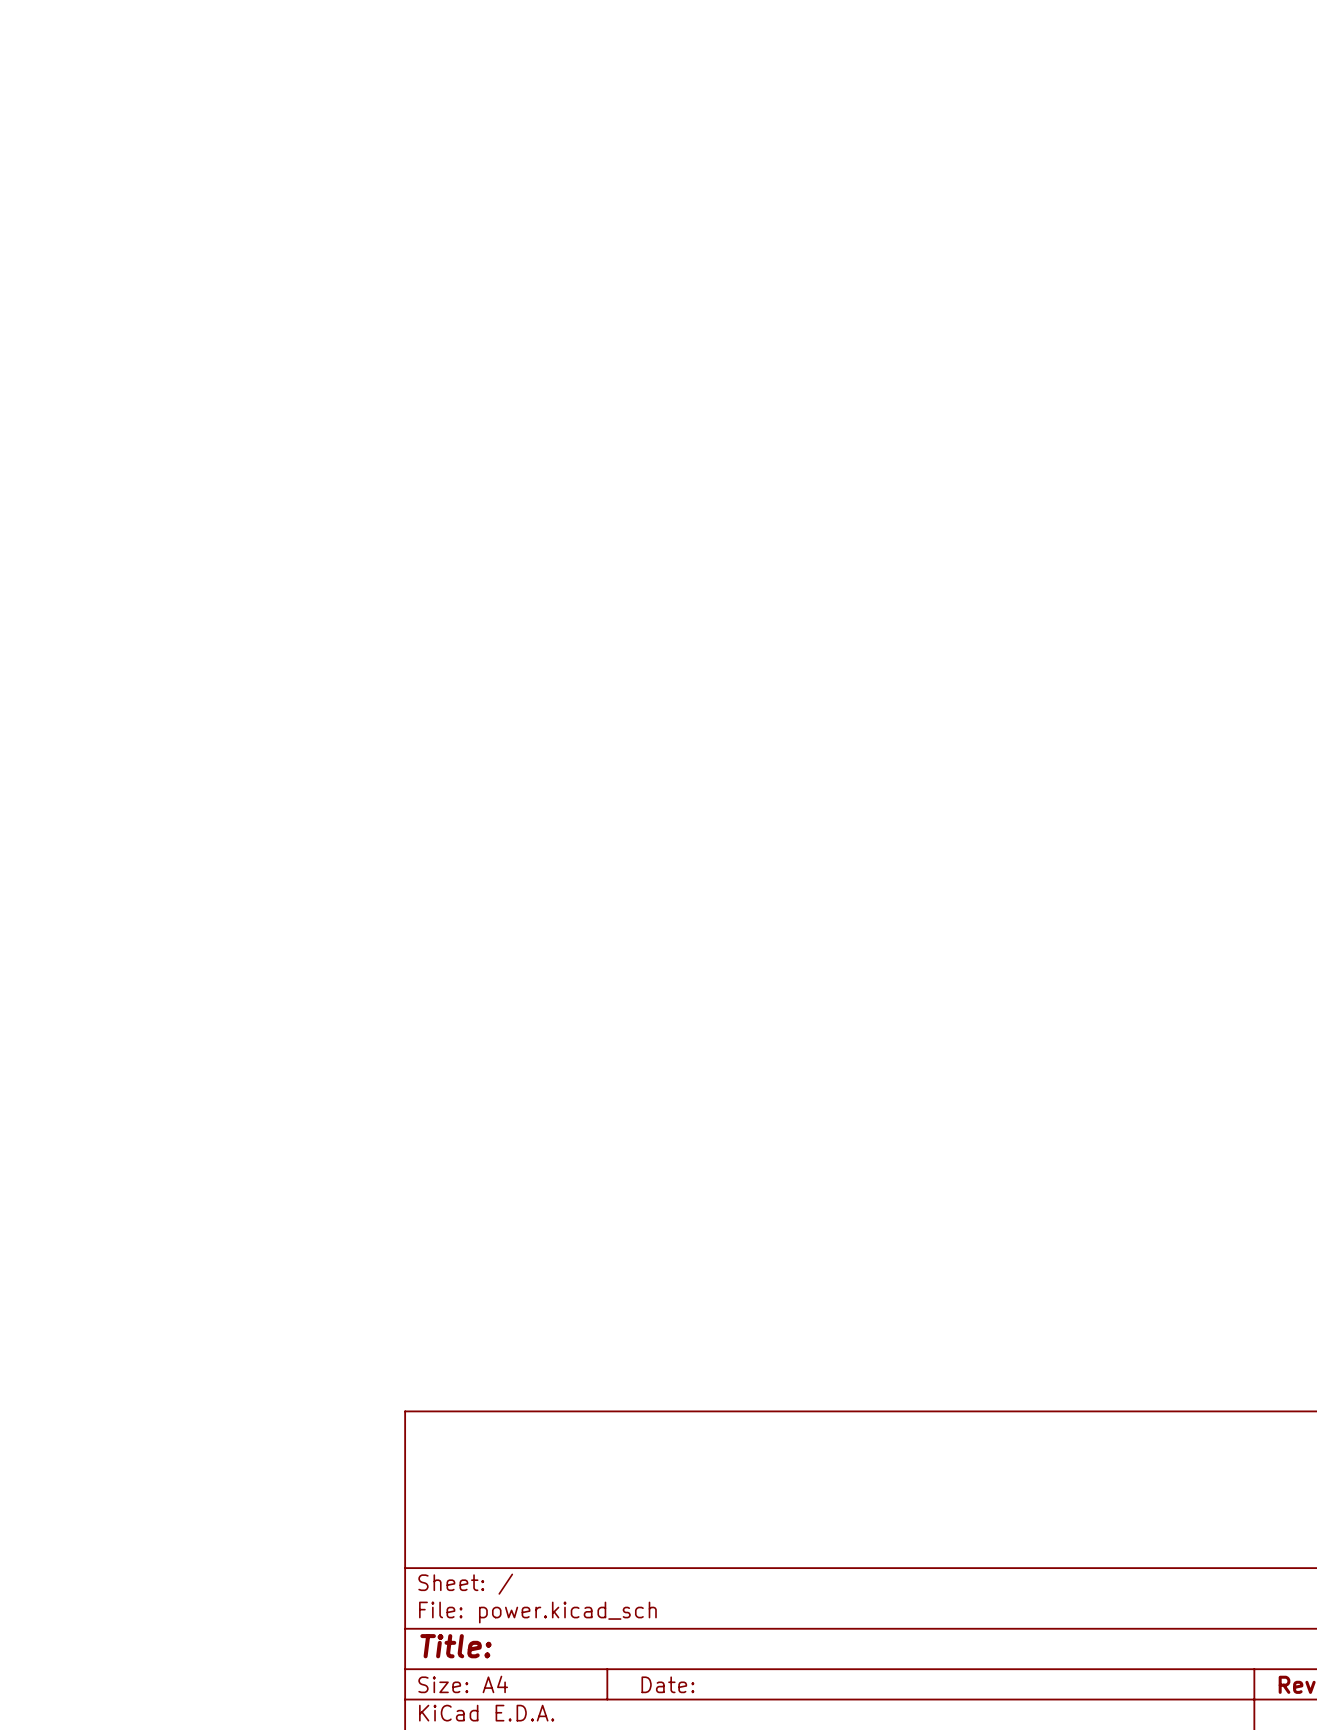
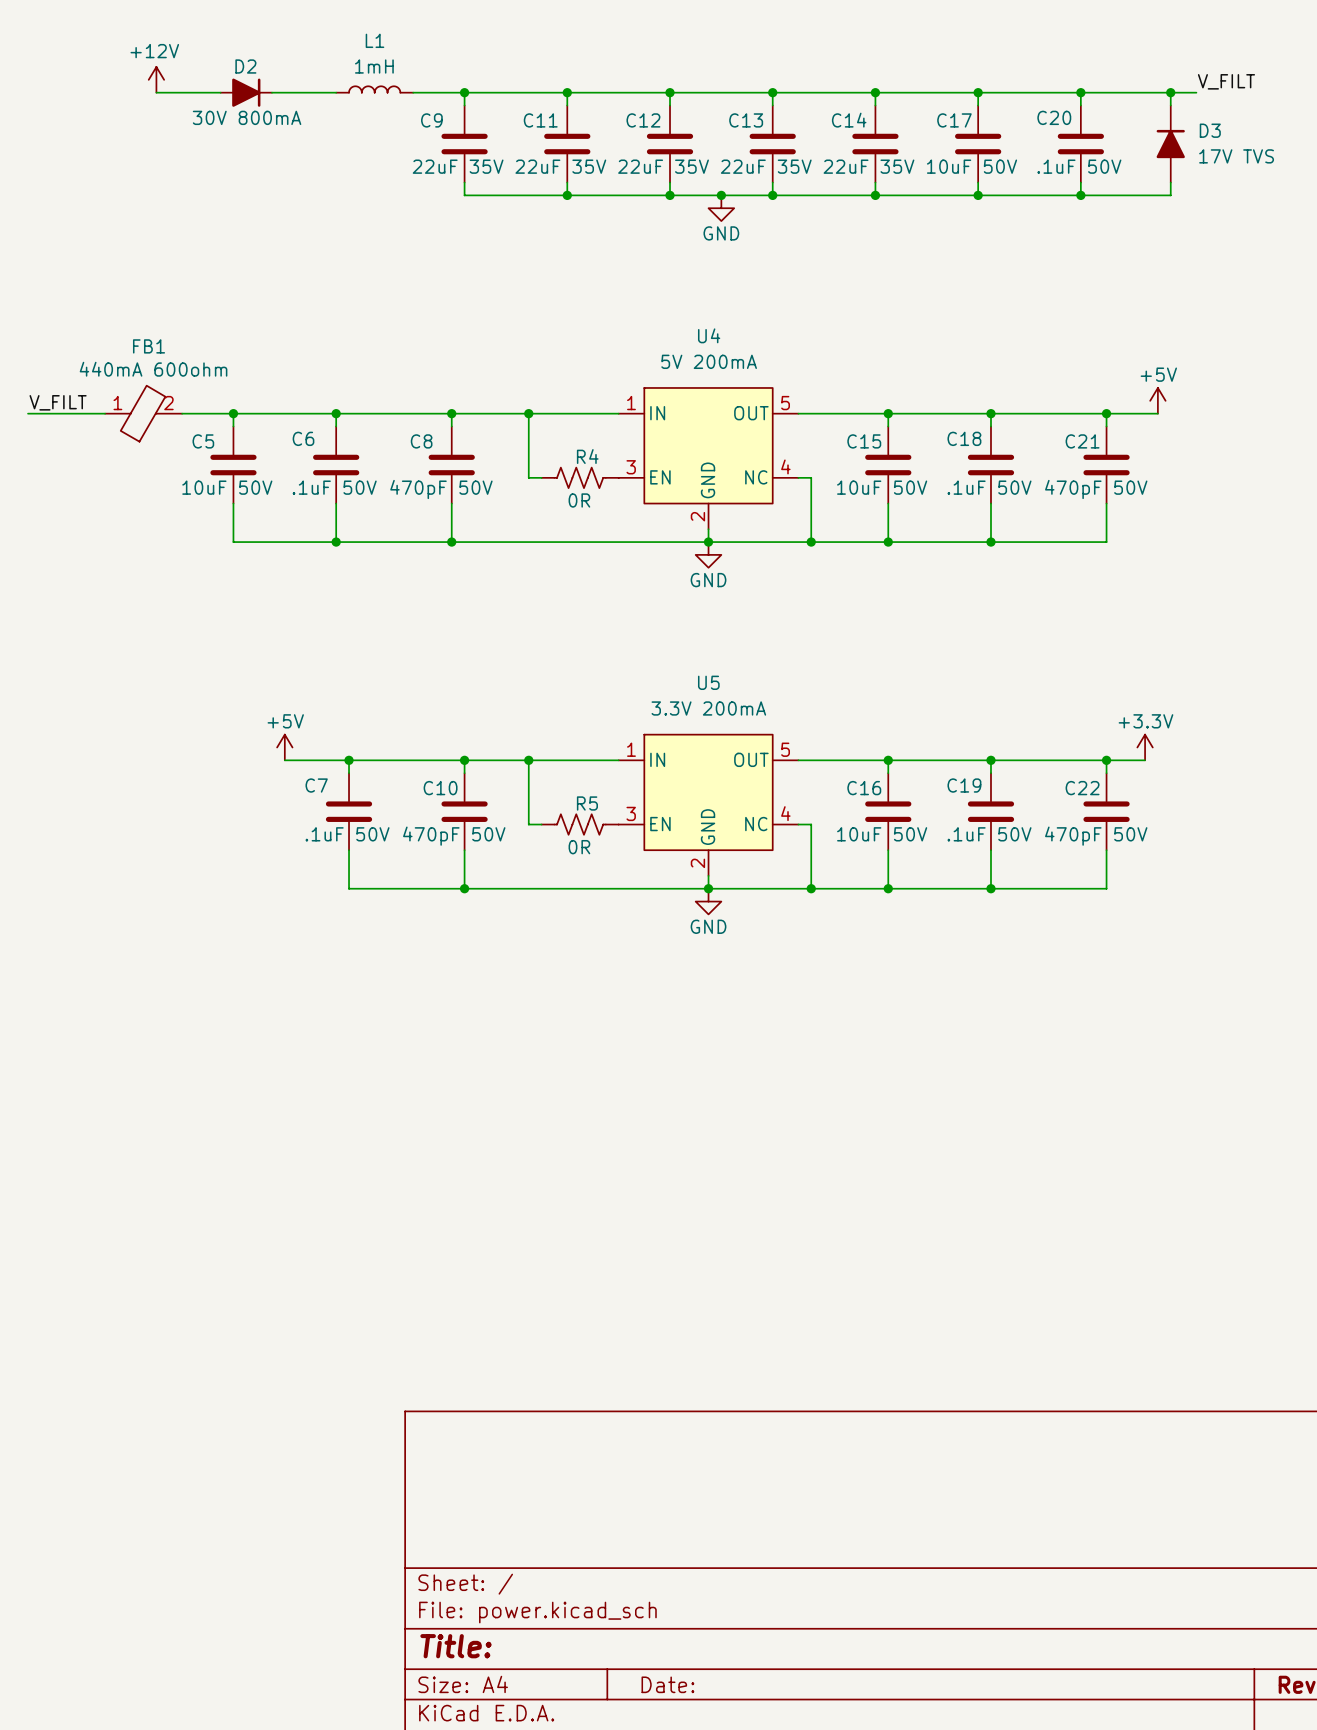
power symbol: none -> +12V (156, 79)
label: none -> V_FILT (1226, 81)
L1: none -> 1mH (374, 89)
wire: none -> (156, 92) (220, 92)
D2: none -> 30V 800mA (246, 92)
wire: none -> (271, 92) (336, 92)
wire: none -> (413, 92) (1196, 92)
wire: none -> (464, 92) (464, 105)
junction: none -> (464, 92)
wire: none -> (567, 92) (567, 105)
junction: none -> (567, 92)
wire: none -> (670, 92) (670, 105)
junction: none -> (670, 92)
wire: none -> (772, 92) (772, 105)
junction: none -> (772, 92)
wire: none -> (875, 92) (875, 105)
junction: none -> (875, 92)
wire: none -> (978, 92) (978, 105)
junction: none -> (978, 92)
wire: none -> (1080, 92) (1080, 105)
junction: none -> (1080, 92)
wire: none -> (1170, 92) (1170, 105)
junction: none -> (1170, 92)
C9: none -> 22uF 35V (464, 144)
C11: none -> 22uF 35V (567, 144)
C12: none -> 22uF 35V (670, 144)
C13: none -> 22uF 35V (772, 144)
C14: none -> 22uF 35V (875, 144)
C17: none -> 10uF 50V (978, 144)
C20: none -> .1uF 50V (1080, 144)
D3: none -> 17V TVS (1170, 144)
wire: none -> (464, 182) (464, 195) (1170, 195) (1170, 182)
wire: none -> (567, 182) (567, 195)
wire: none -> (670, 182) (670, 195)
wire: none -> (772, 182) (772, 195)
wire: none -> (875, 182) (875, 195)
wire: none -> (978, 182) (978, 195)
wire: none -> (1080, 182) (1080, 195)
junction: none -> (567, 195)
junction: none -> (670, 195)
junction: none -> (721, 195)
junction: none -> (772, 195)
junction: none -> (875, 195)
junction: none -> (978, 195)
junction: none -> (1080, 195)
power symbol: none -> GND (721, 208)
power symbol: none -> +5V (1157, 400)
label: none -> V_FILT (58, 402)
wire: none -> (28, 413) (105, 413)
FB1: none -> 440mA 600ohm (143, 413)
wire: none -> (182, 413) (618, 413)
wire: none -> (233, 413) (233, 426)
junction: none -> (233, 413)
wire: none -> (336, 413) (336, 426)
junction: none -> (336, 413)
wire: none -> (451, 413) (451, 426)
junction: none -> (451, 413)
wire: none -> (528, 413) (528, 477) (541, 477)
junction: none -> (528, 413)
wire: none -> (798, 413) (1157, 413)
wire: none -> (888, 413) (888, 426)
junction: none -> (888, 413)
wire: none -> (990, 413) (990, 426)
junction: none -> (990, 413)
wire: none -> (1106, 413) (1106, 426)
junction: none -> (1106, 413)
U4: none -> 5V 200mA (708, 458)
C5: none -> 10uF 50V (233, 465)
C6: none -> .1uF 50V (336, 465)
C8: none -> 470pF 50V (451, 465)
C15: none -> 10uF 50V (888, 465)
C18: none -> .1uF 50V (990, 465)
C21: none -> 470pF 50V (1106, 465)
R4: none -> 0R (580, 477)
wire: none -> (798, 477) (811, 477) (811, 542)
wire: none -> (233, 503) (233, 542) (1106, 542) (1106, 503)
wire: none -> (336, 503) (336, 542)
wire: none -> (451, 503) (451, 542)
wire: none -> (888, 503) (888, 542)
wire: none -> (990, 503) (990, 542)
wire: none -> (708, 529) (708, 542)
junction: none -> (336, 542)
junction: none -> (451, 542)
junction: none -> (708, 542)
junction: none -> (811, 542)
junction: none -> (888, 542)
junction: none -> (990, 542)
power symbol: none -> GND (708, 554)
power symbol: none -> +5V (284, 747)
power symbol: none -> +3.3V (1145, 747)
wire: none -> (284, 760) (618, 760)
wire: none -> (349, 760) (349, 773)
junction: none -> (349, 760)
wire: none -> (464, 760) (464, 773)
junction: none -> (464, 760)
wire: none -> (528, 760) (528, 824) (541, 824)
junction: none -> (528, 760)
wire: none -> (798, 760) (1145, 760)
wire: none -> (888, 760) (888, 773)
junction: none -> (888, 760)
wire: none -> (990, 760) (990, 773)
junction: none -> (990, 760)
wire: none -> (1106, 760) (1106, 773)
junction: none -> (1106, 760)
U5: none -> 3.3V 200mA (708, 805)
C7: none -> .1uF 50V (349, 811)
C10: none -> 470pF 50V (464, 811)
C16: none -> 10uF 50V (888, 811)
C19: none -> .1uF 50V (990, 811)
C22: none -> 470pF 50V (1106, 811)
R5: none -> 0R (580, 824)
wire: none -> (798, 824) (811, 824) (811, 888)
wire: none -> (349, 850) (349, 888) (1106, 888) (1106, 850)
wire: none -> (464, 850) (464, 888)
wire: none -> (888, 850) (888, 888)
wire: none -> (990, 850) (990, 888)
wire: none -> (708, 875) (708, 888)
junction: none -> (464, 888)
junction: none -> (708, 888)
junction: none -> (811, 888)
junction: none -> (888, 888)
junction: none -> (990, 888)
power symbol: none -> GND (708, 901)

